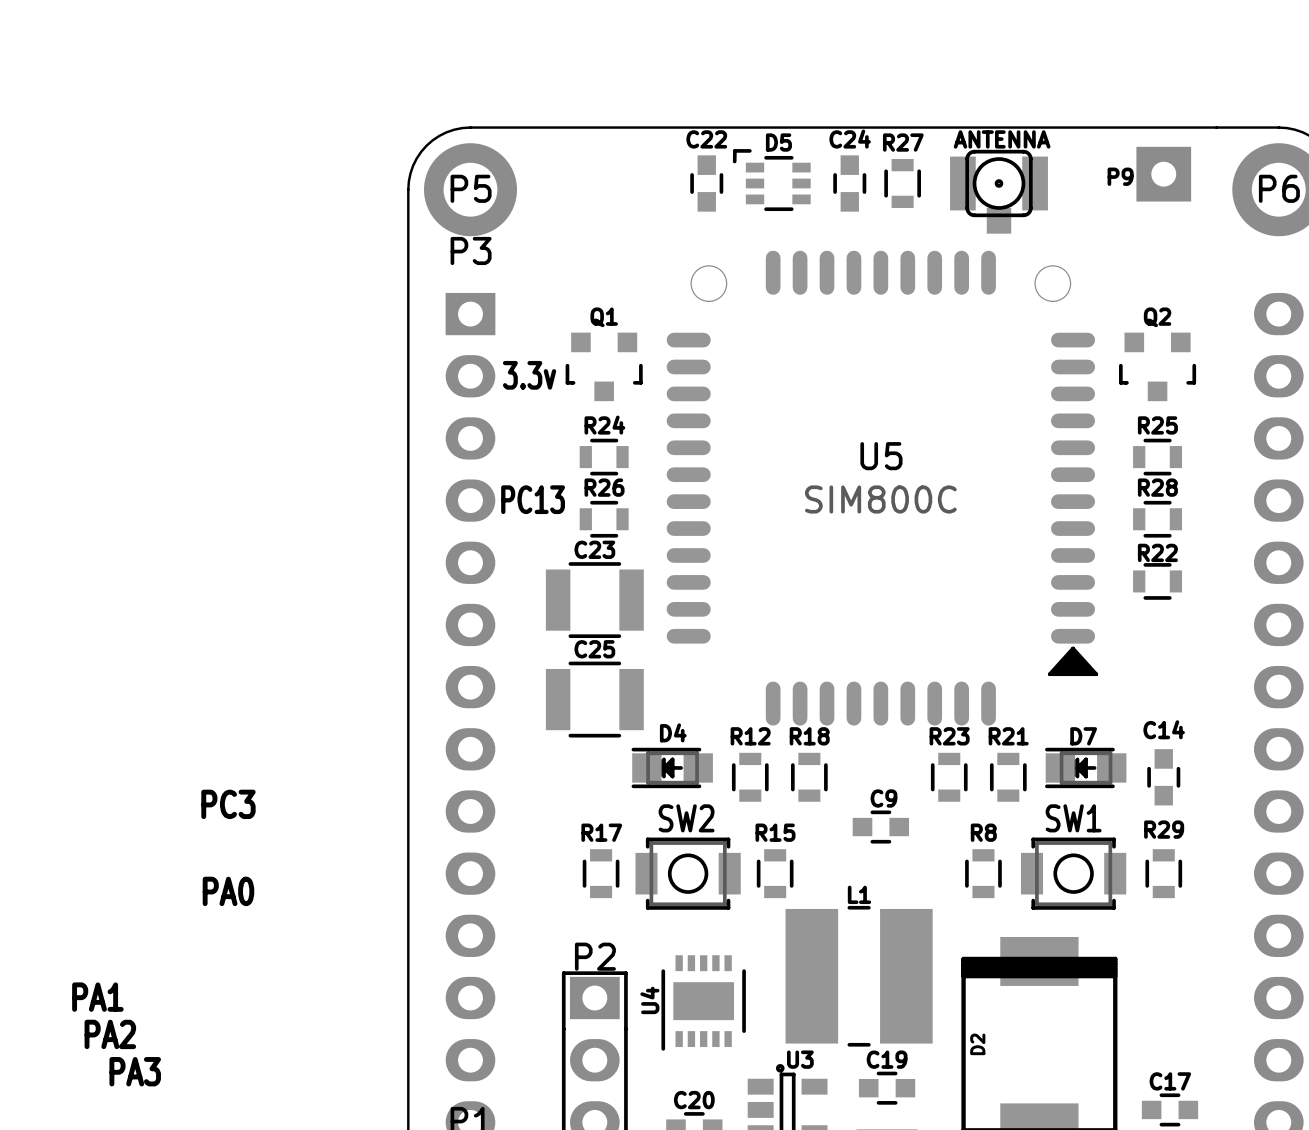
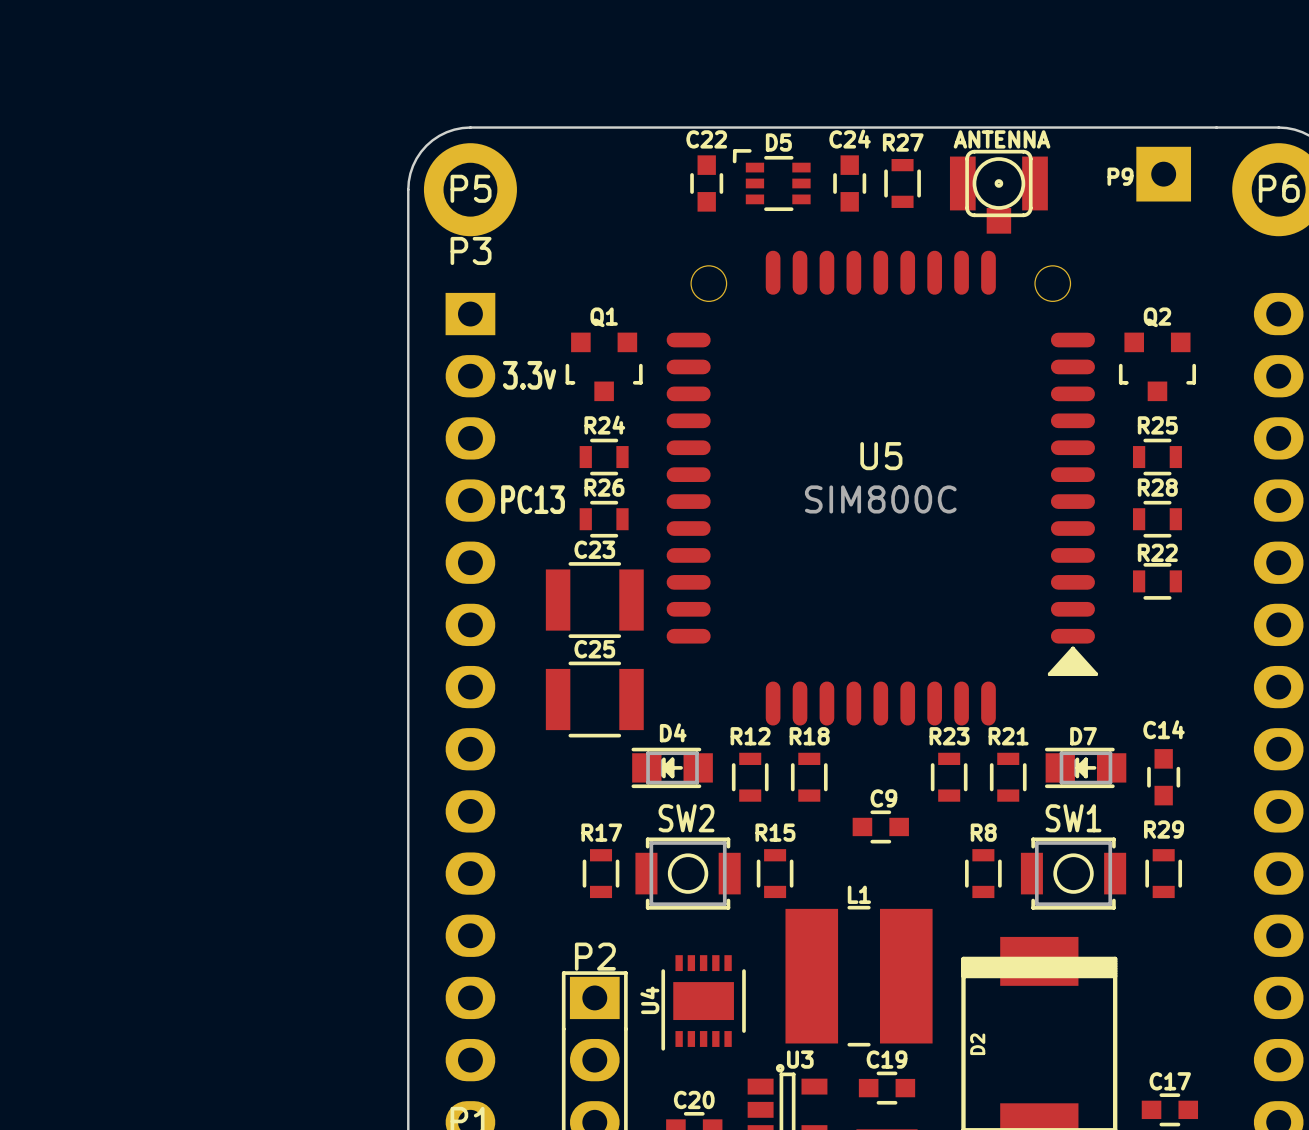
text: PC3 (228, 804) -> none
text: PA0 (228, 891) -> none
text: PA1 (97, 997) -> none
text: PA2 (110, 1034) -> none
text: PA3 (135, 1071) -> none

